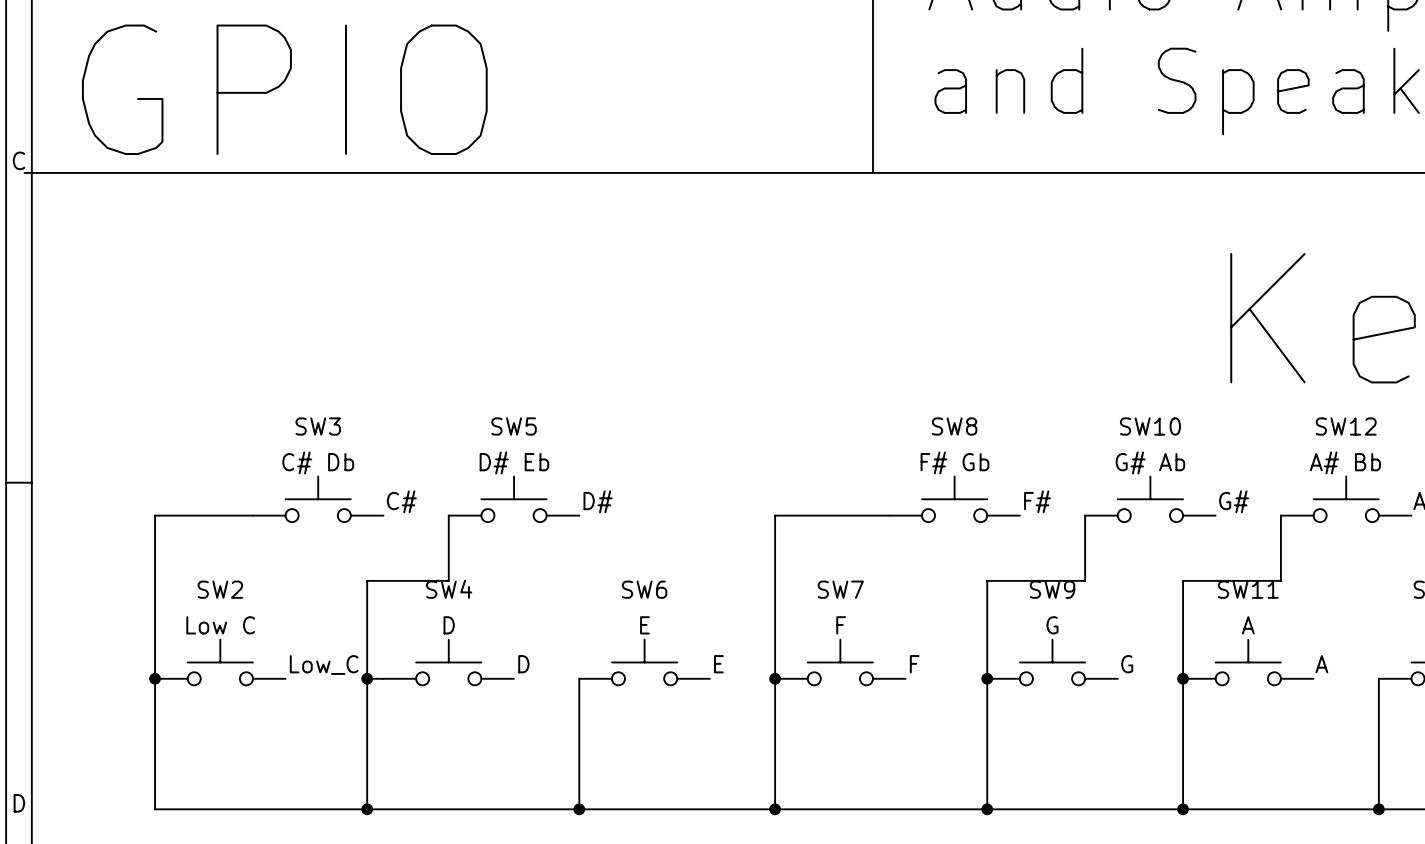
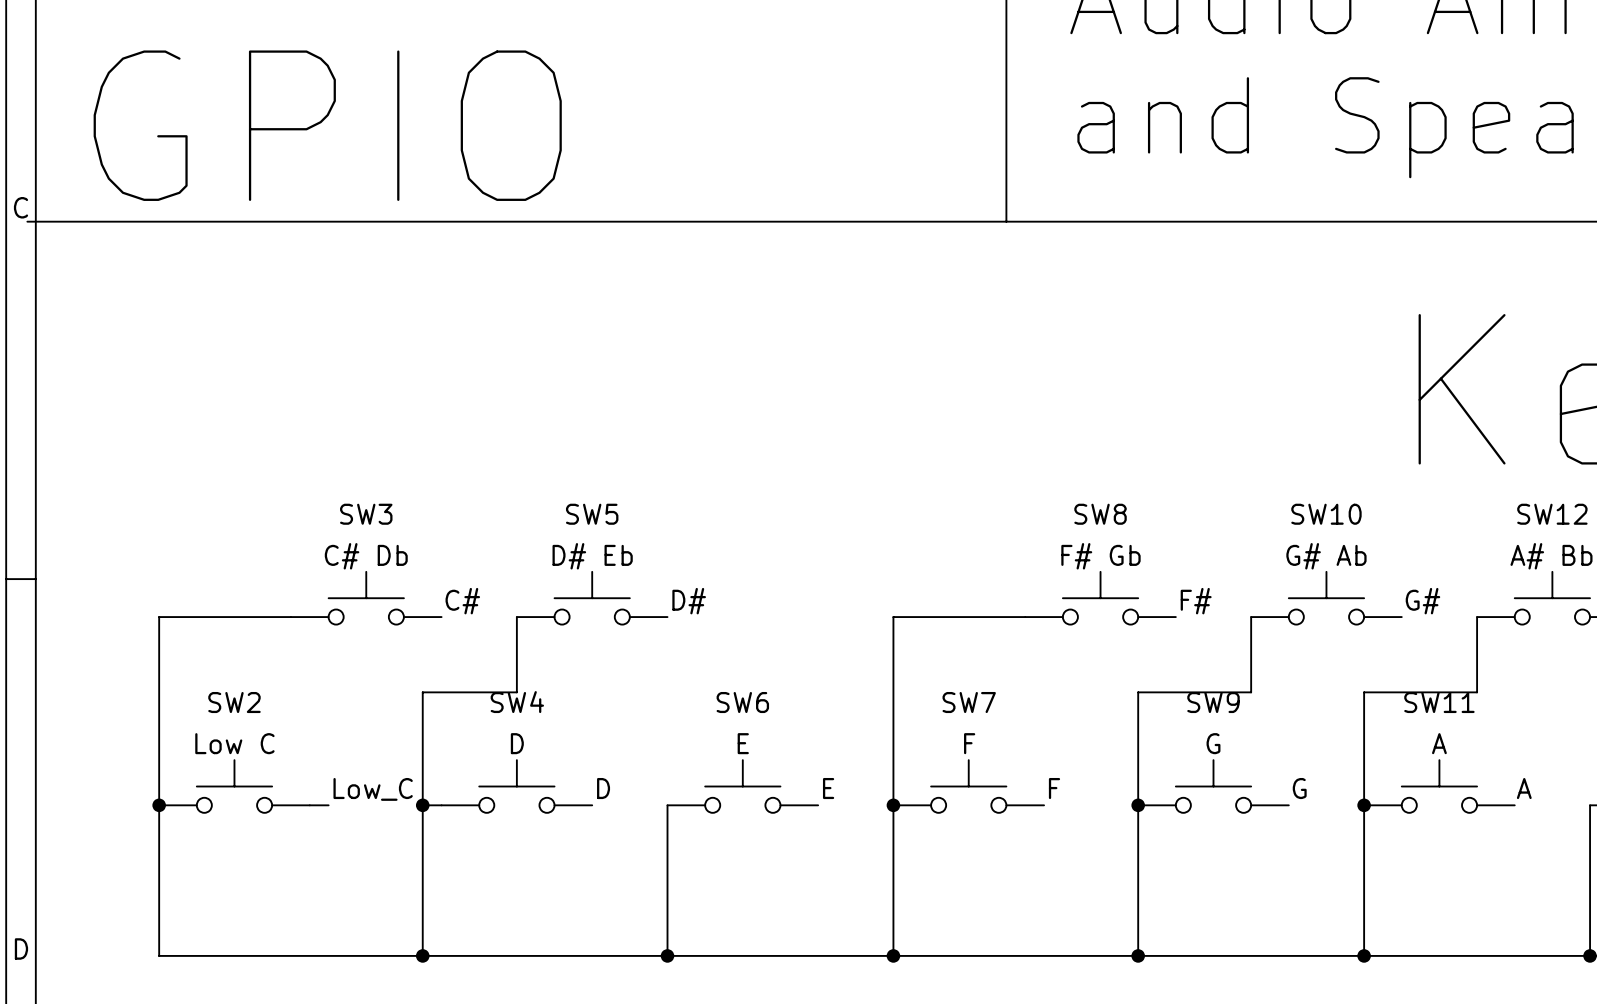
wire: (155, 515) (155, 809) -> (177, 617) (159, 617) (159, 955) (177, 955)
SW2 position: (220, 662) -> (234, 786)
junction position: (155, 678) -> (159, 805)

